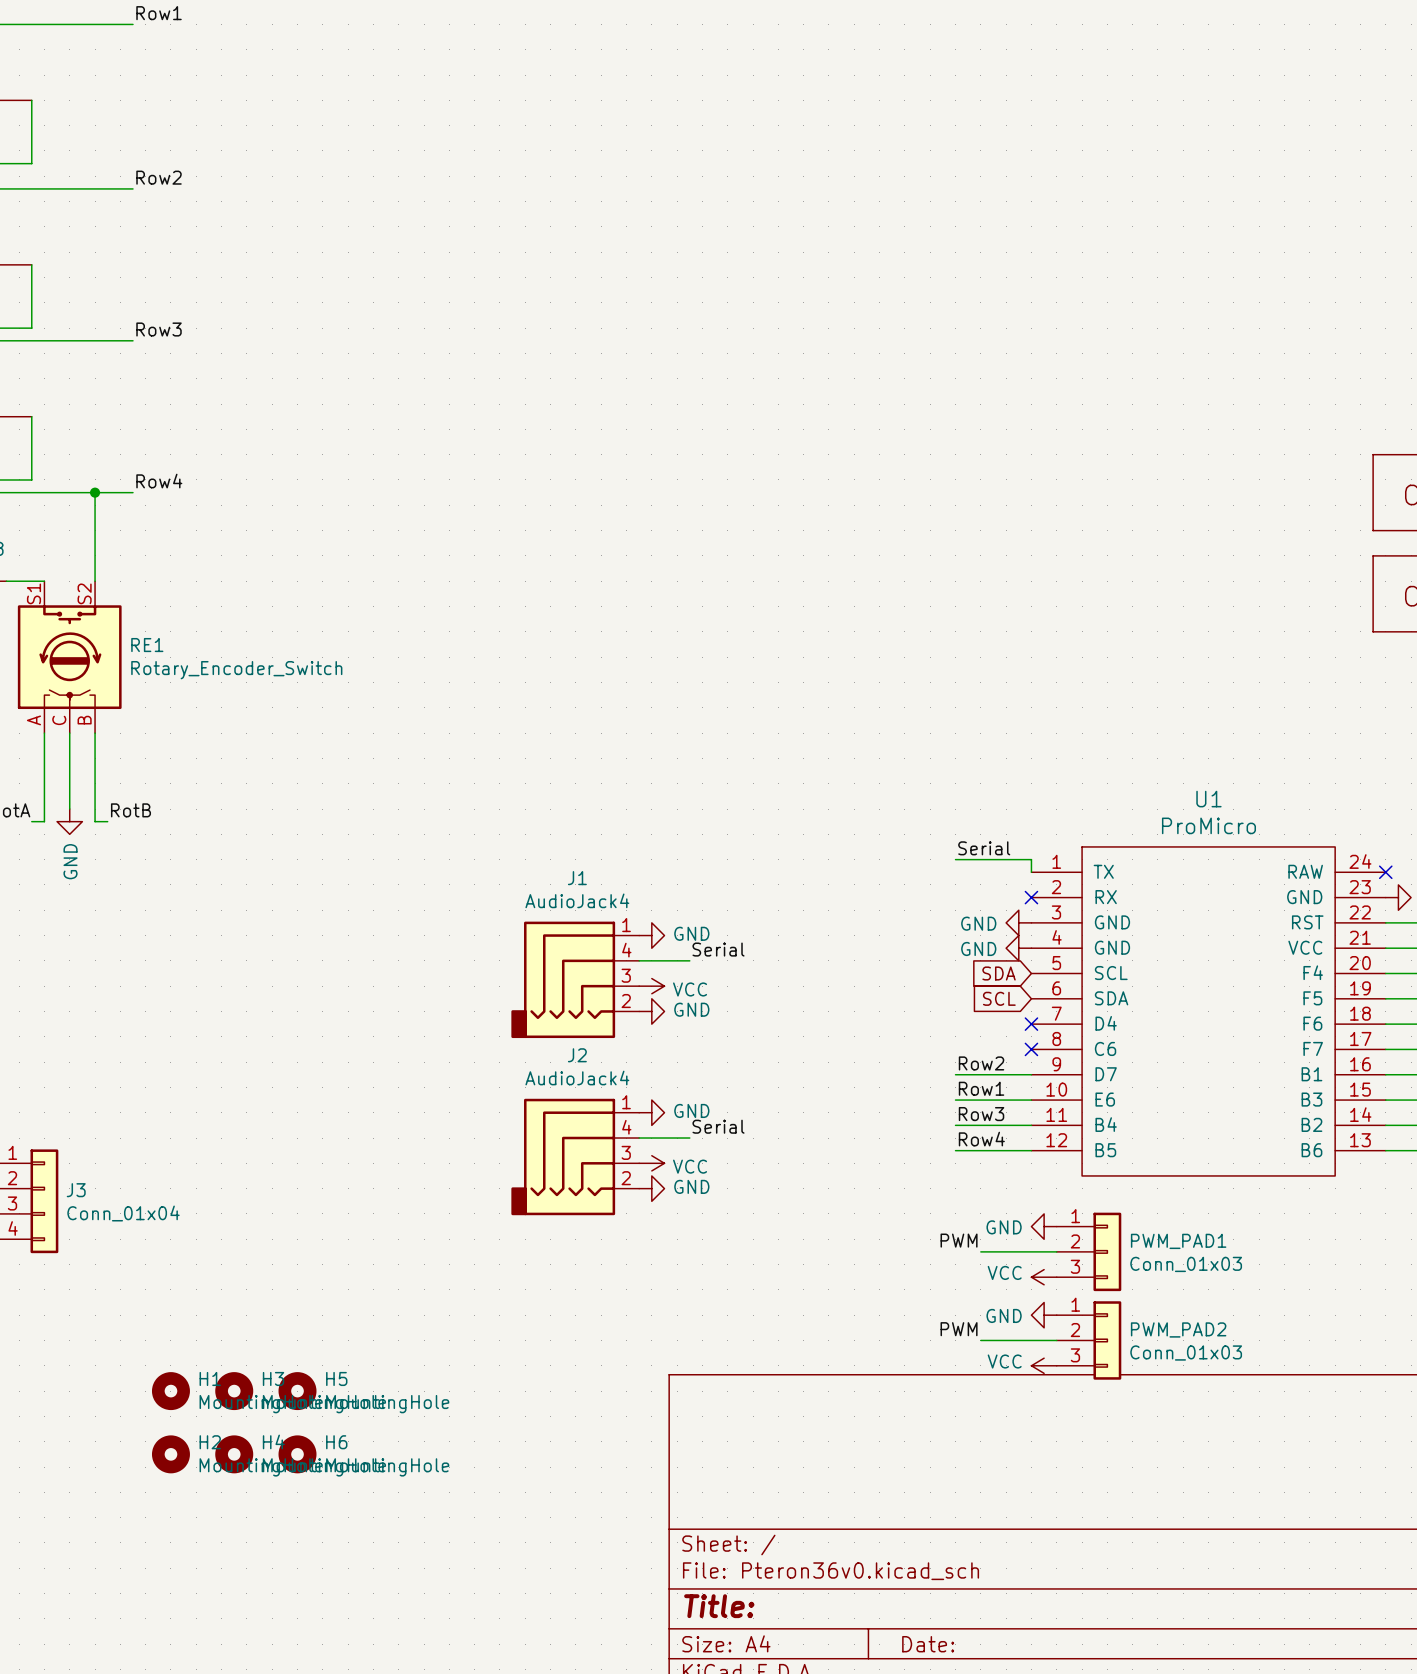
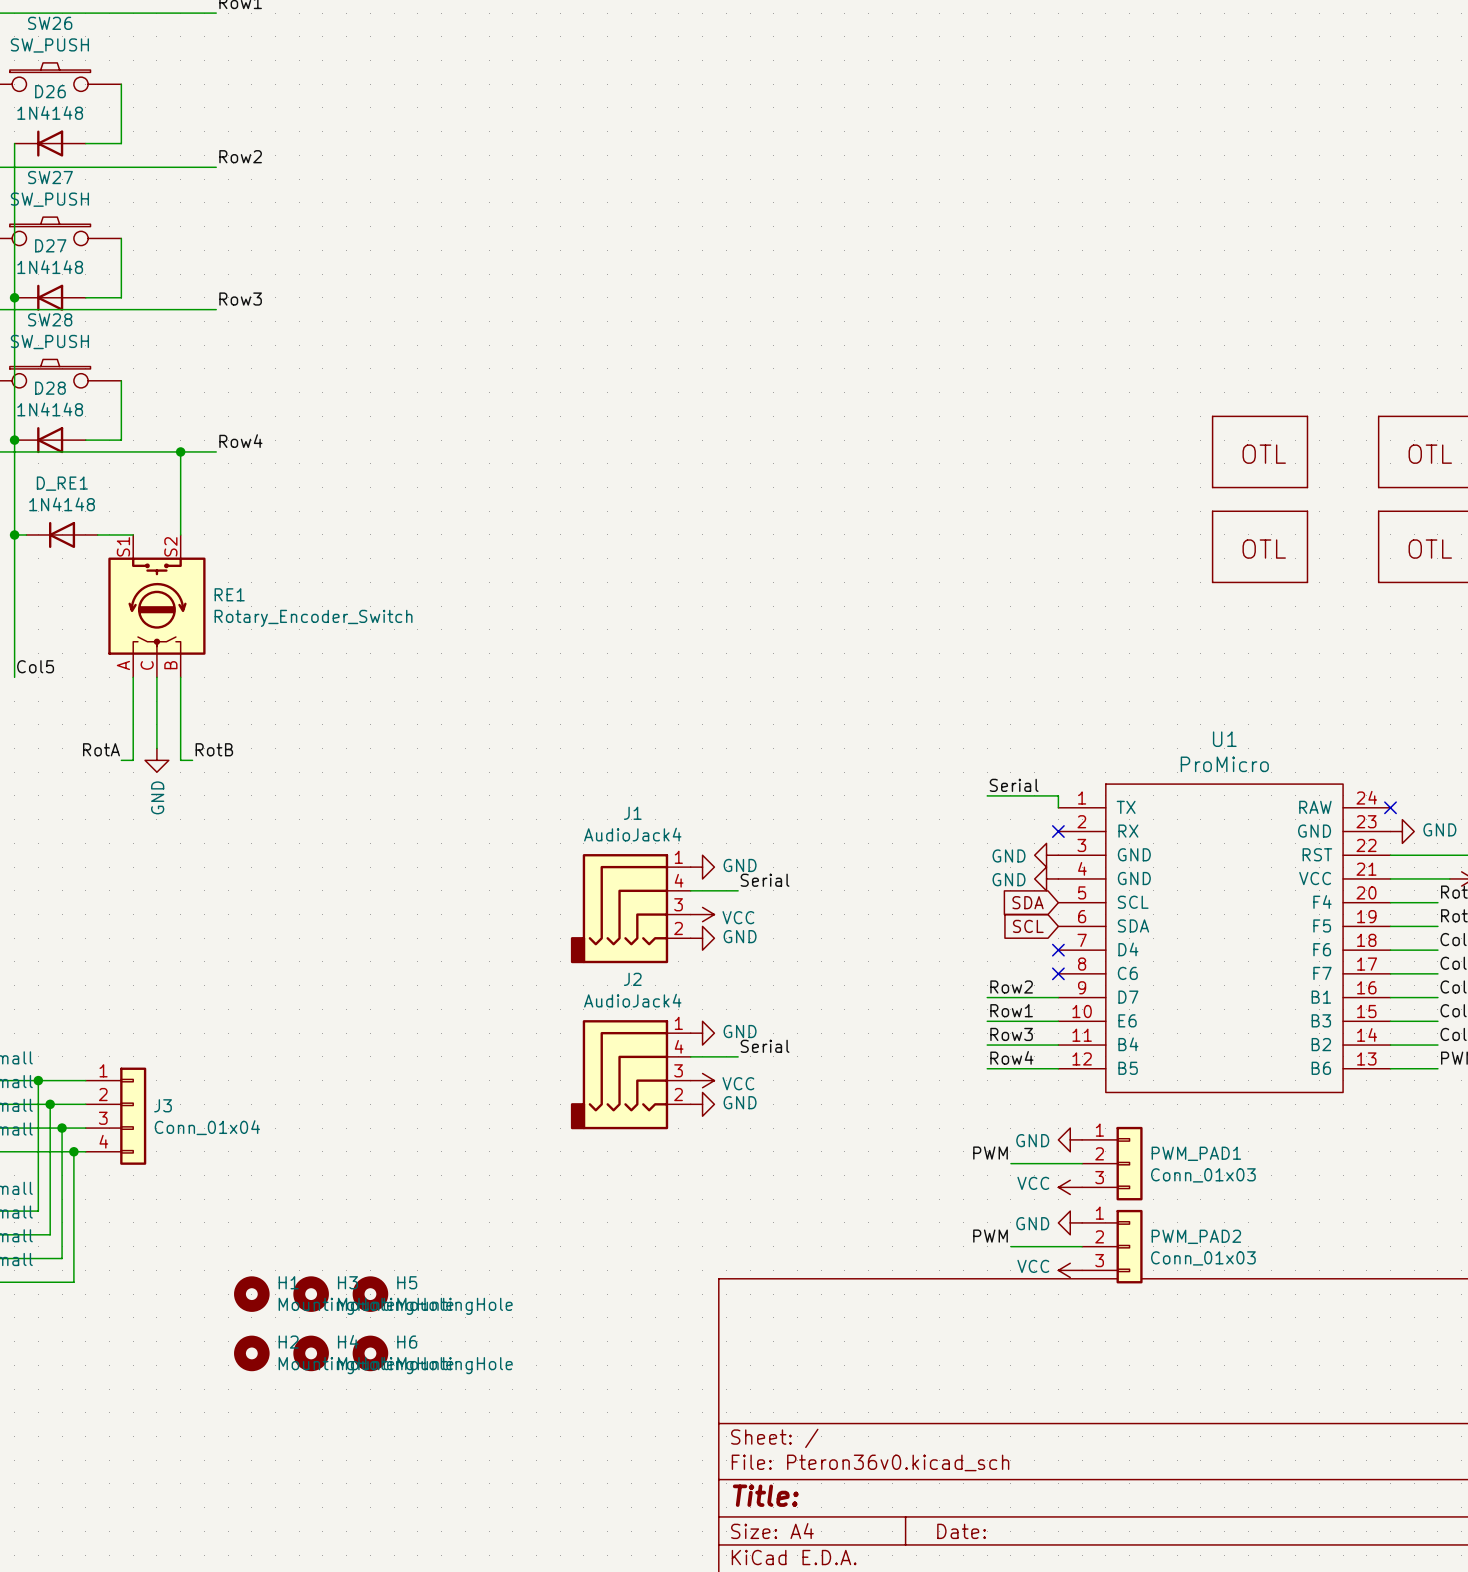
part: none -> (1260, 451)
part: none -> (1260, 546)

